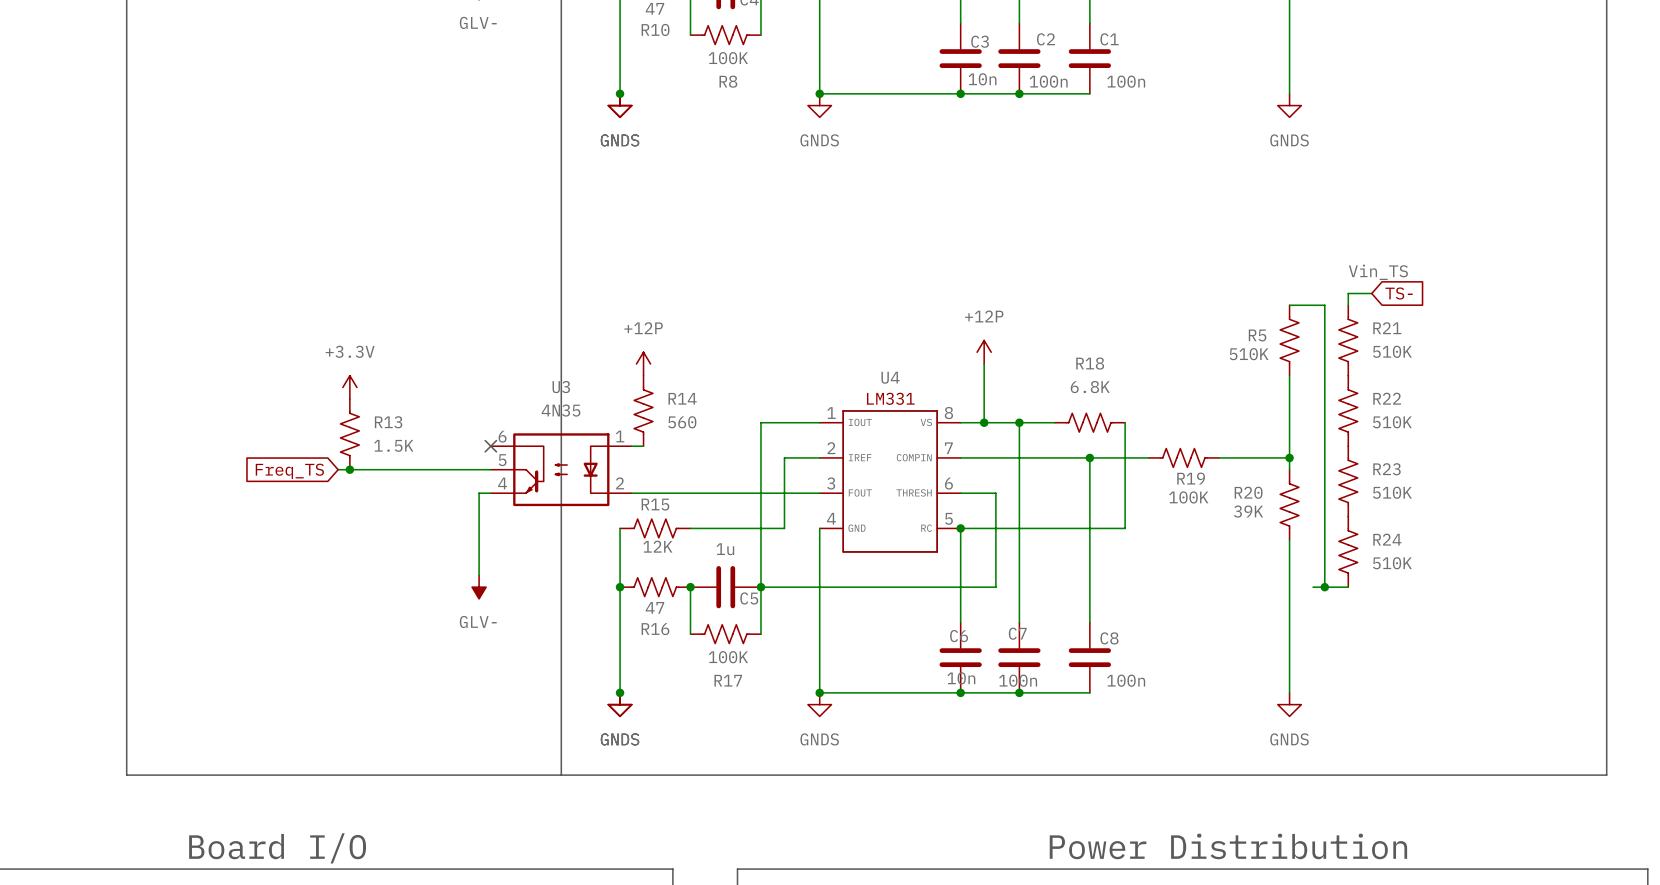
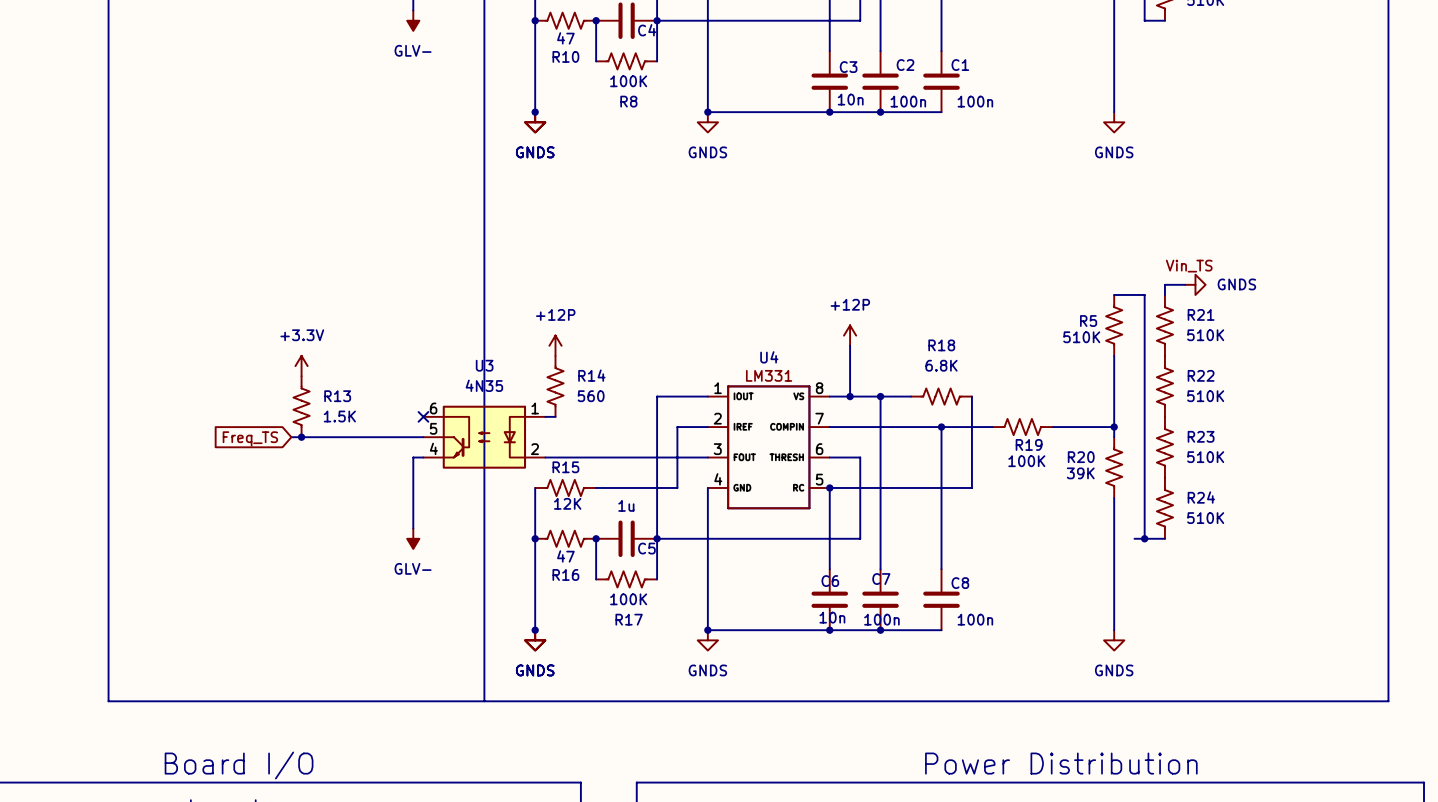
power symbol: none -> GNDS (1195, 284)
global label: TS- (1399, 293) -> none

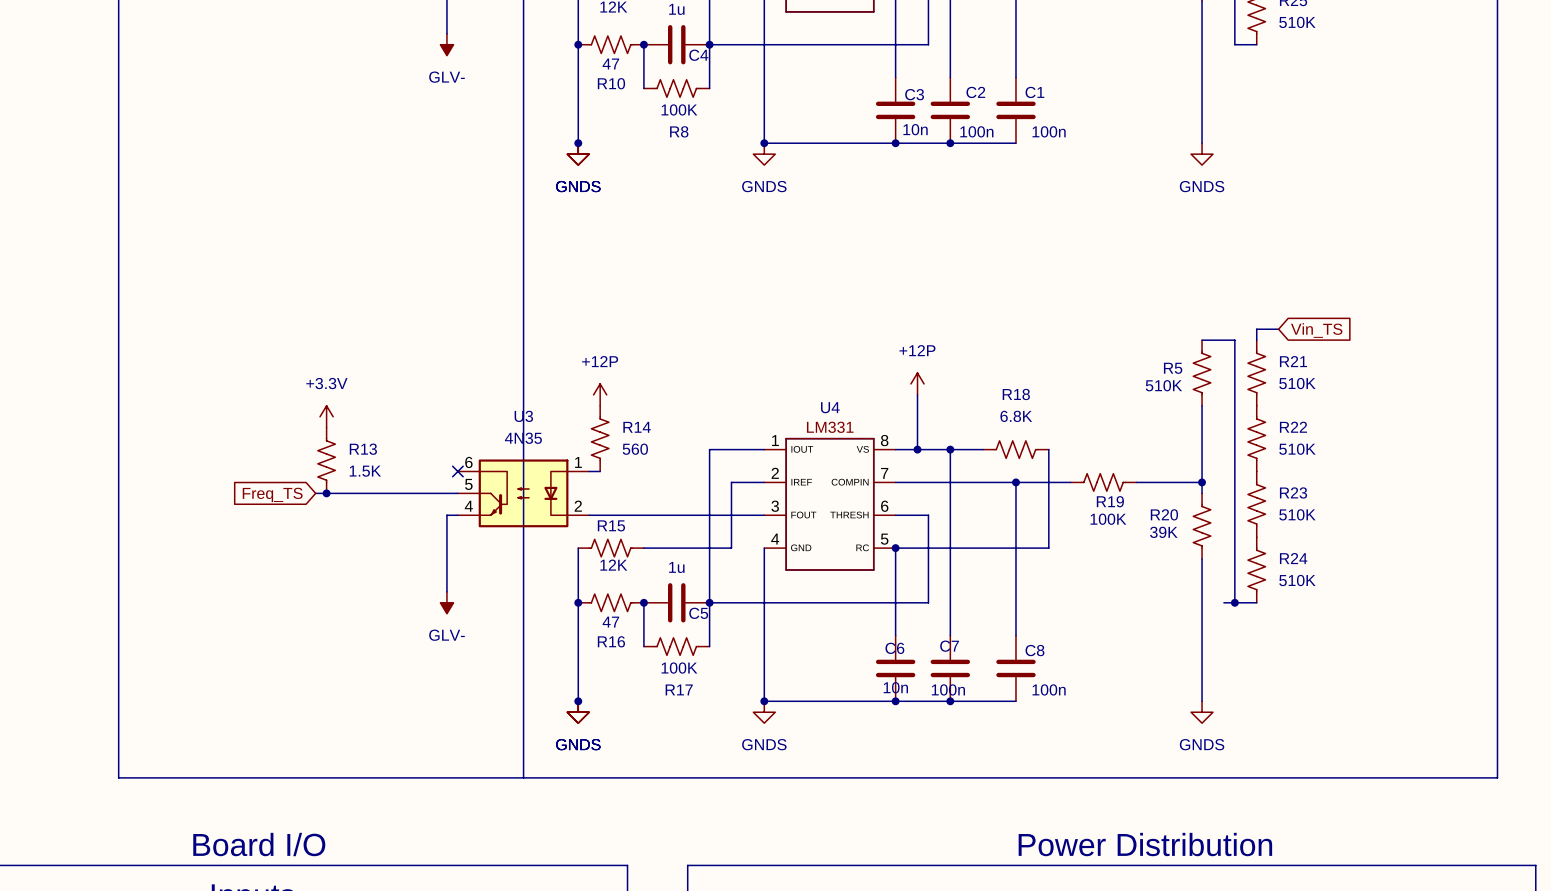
label: Vin_TS (1189, 266) -> none
power symbol: GNDS (1195, 284) -> none
global label: none -> Vin_TS (1316, 330)

